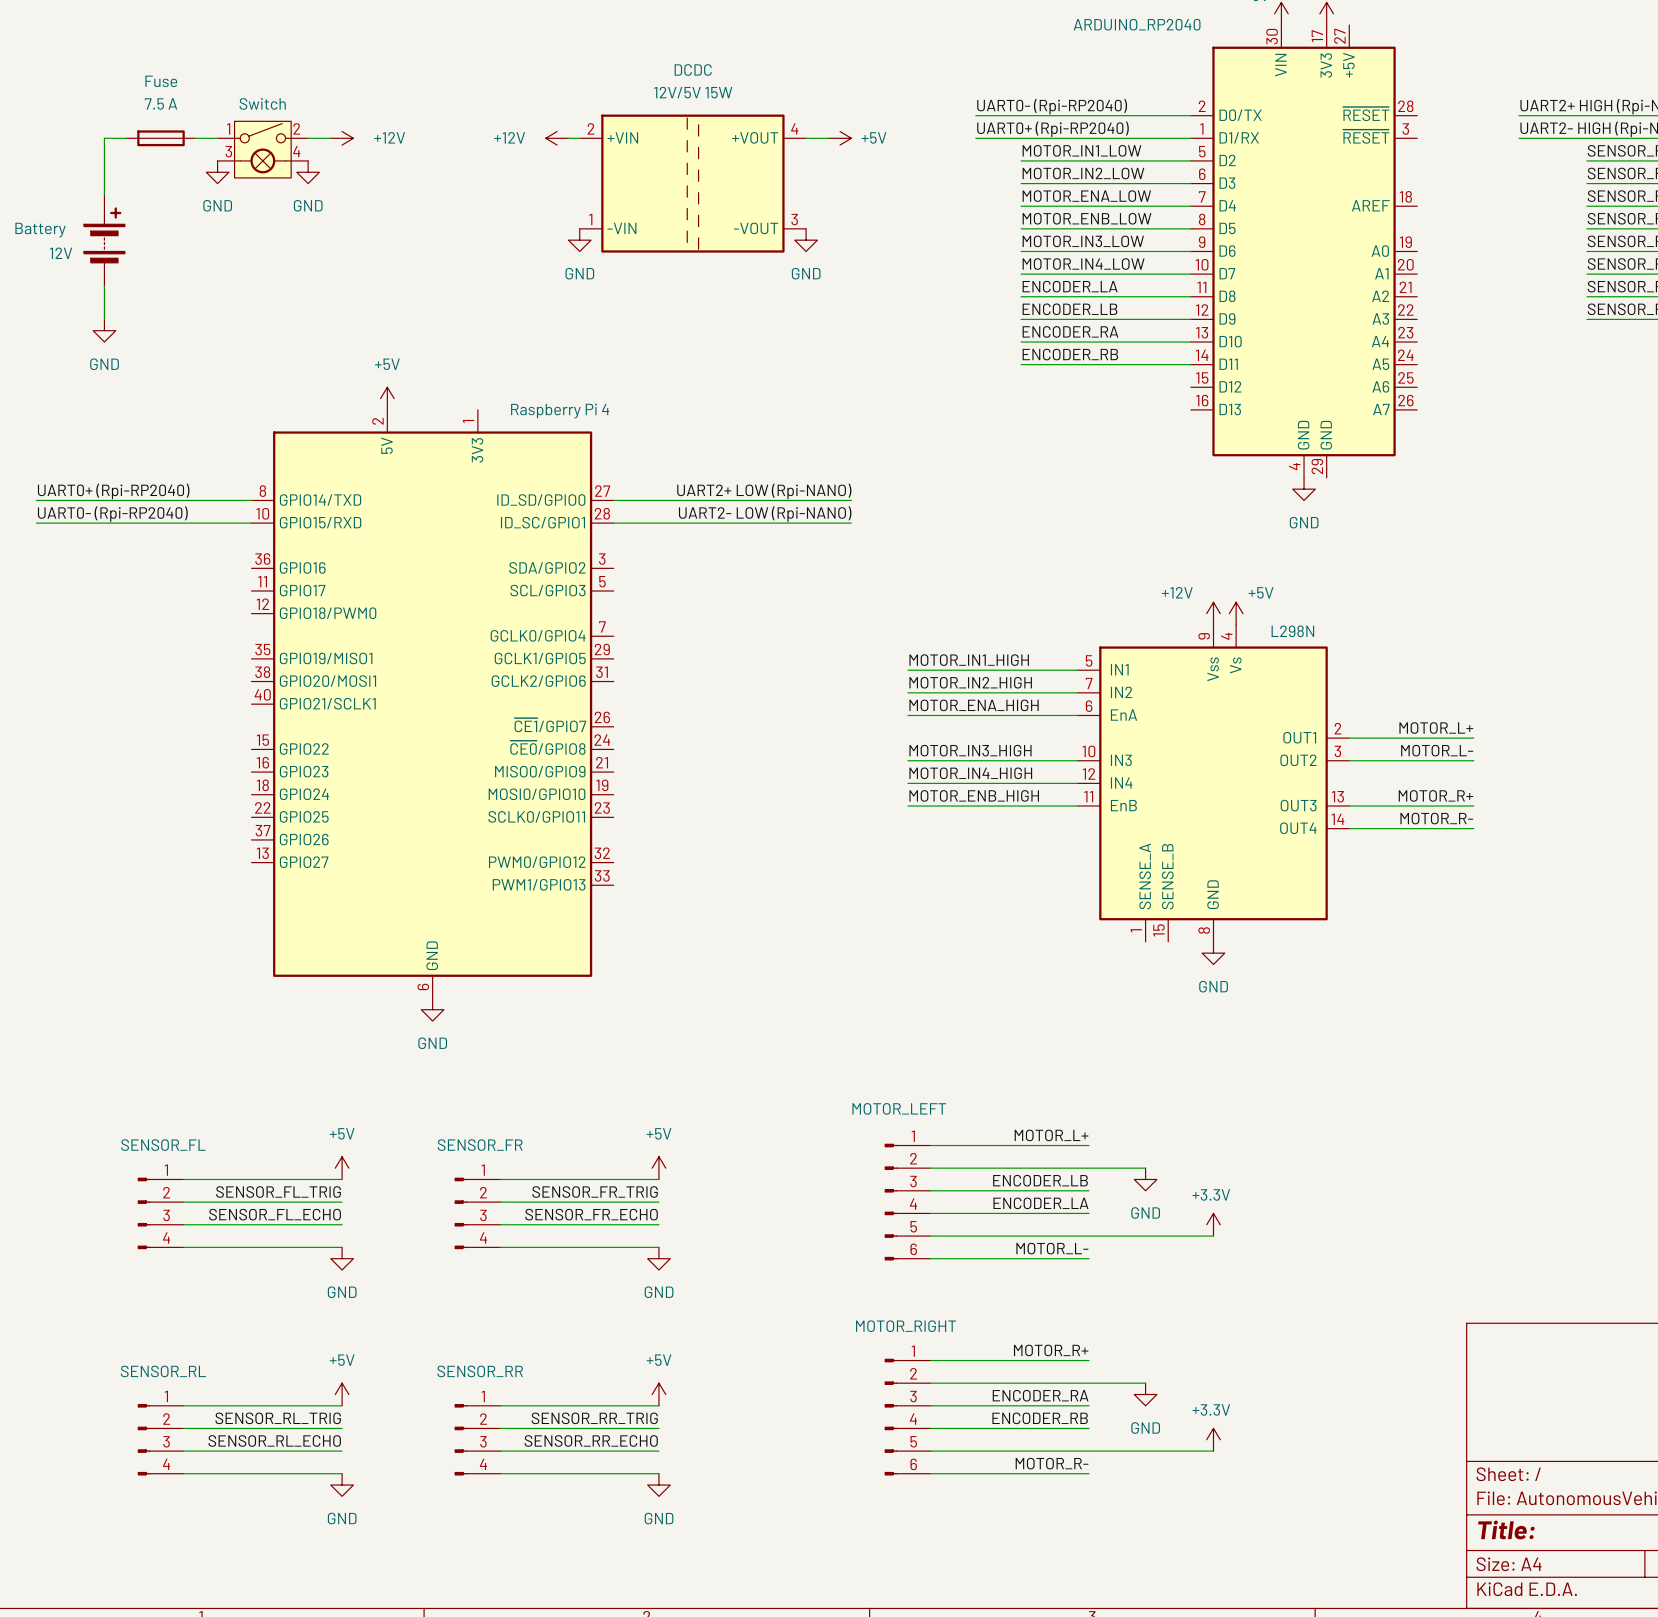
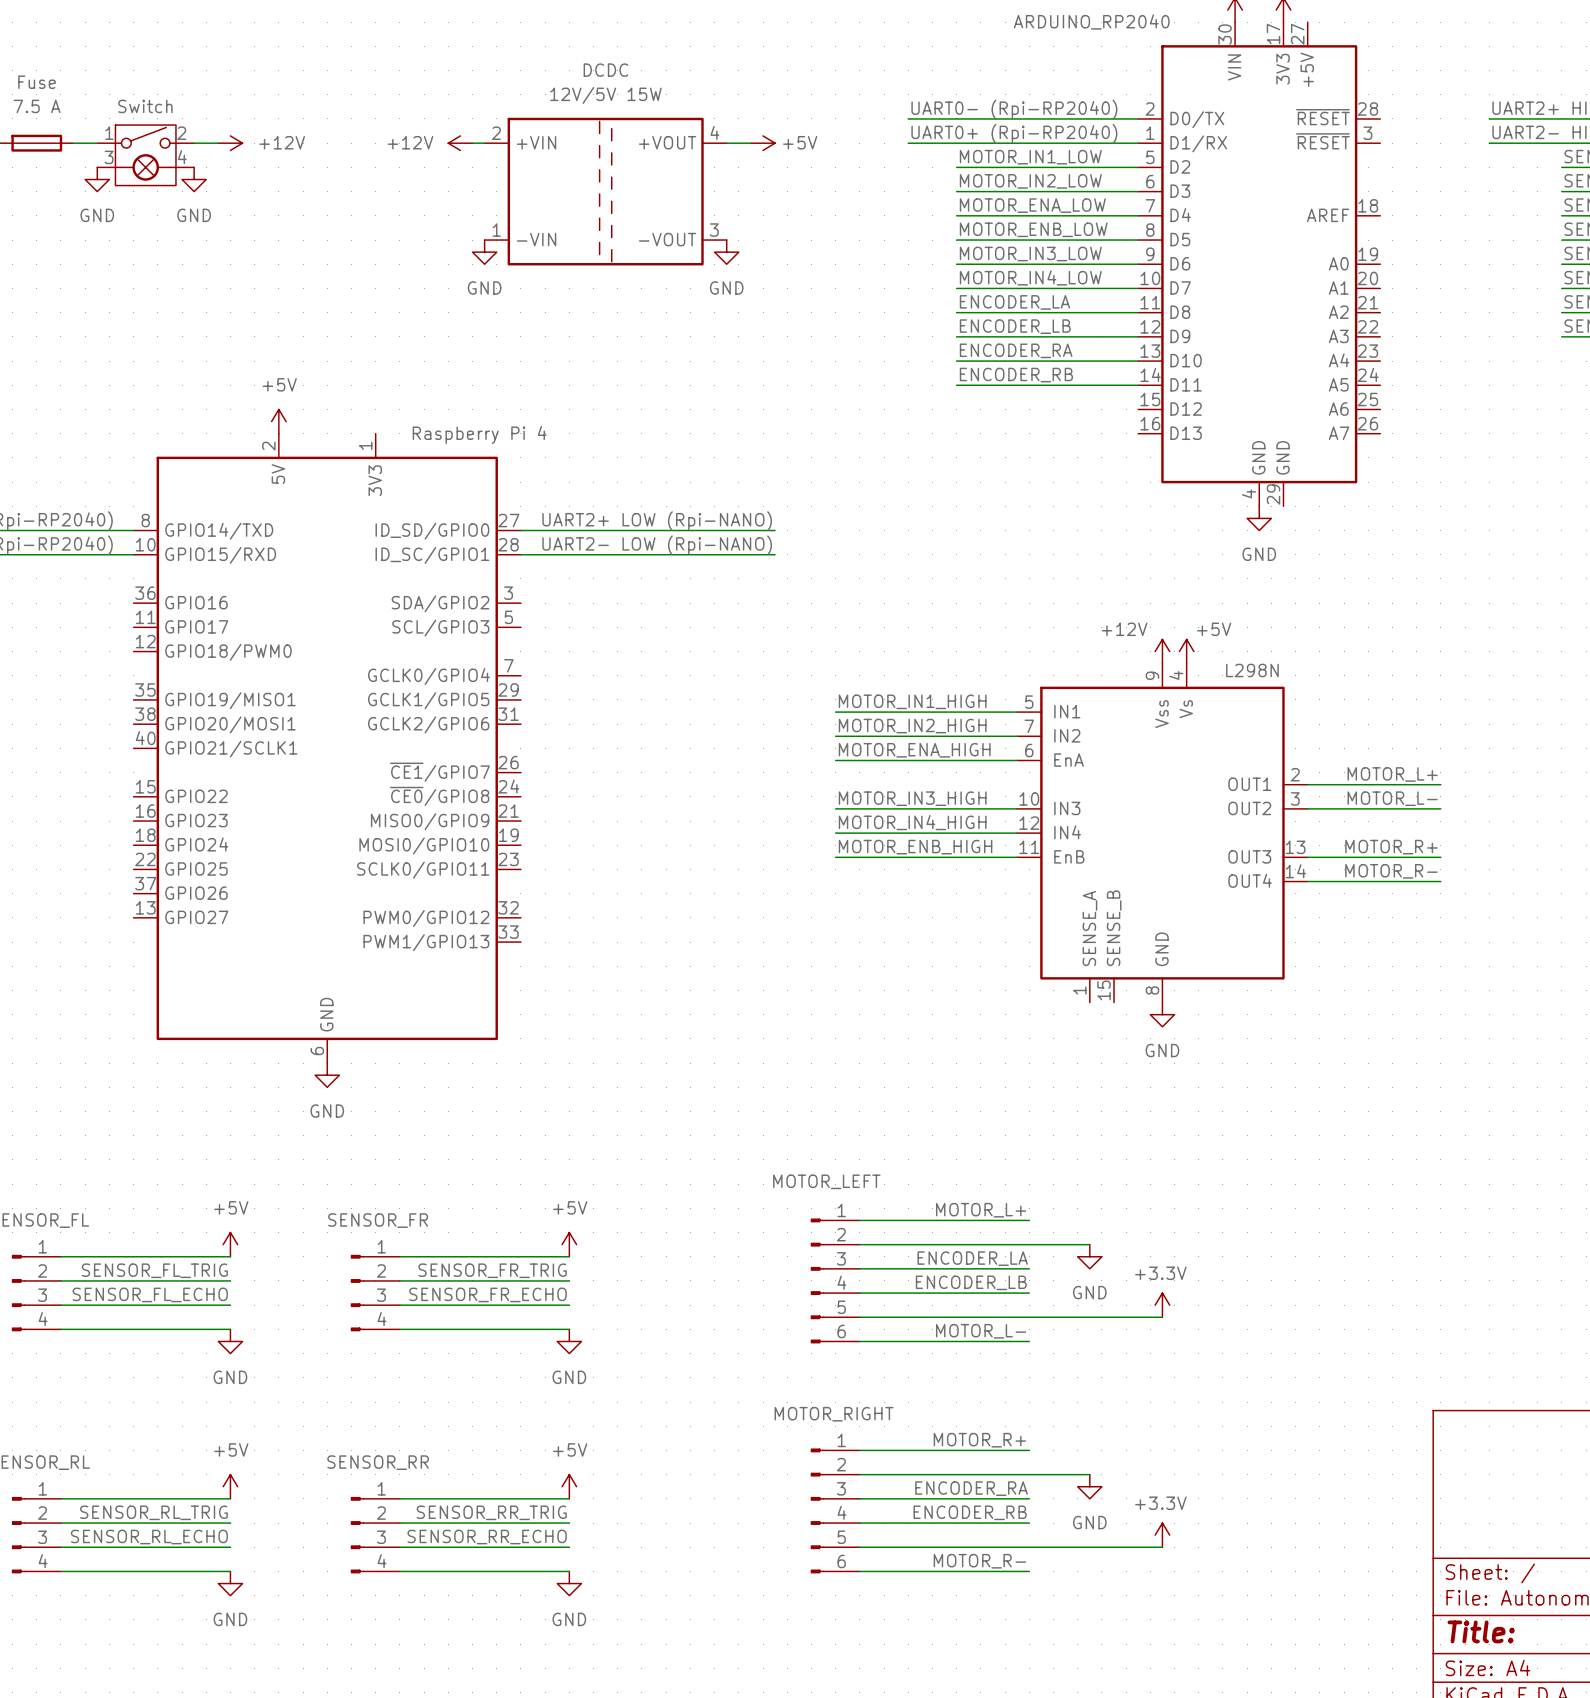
label: ENCODER_LB (1040, 1180) -> ENCODER_LA (972, 1258)
label: ENCODER_LA (1040, 1203) -> ENCODER_LB (971, 1282)

